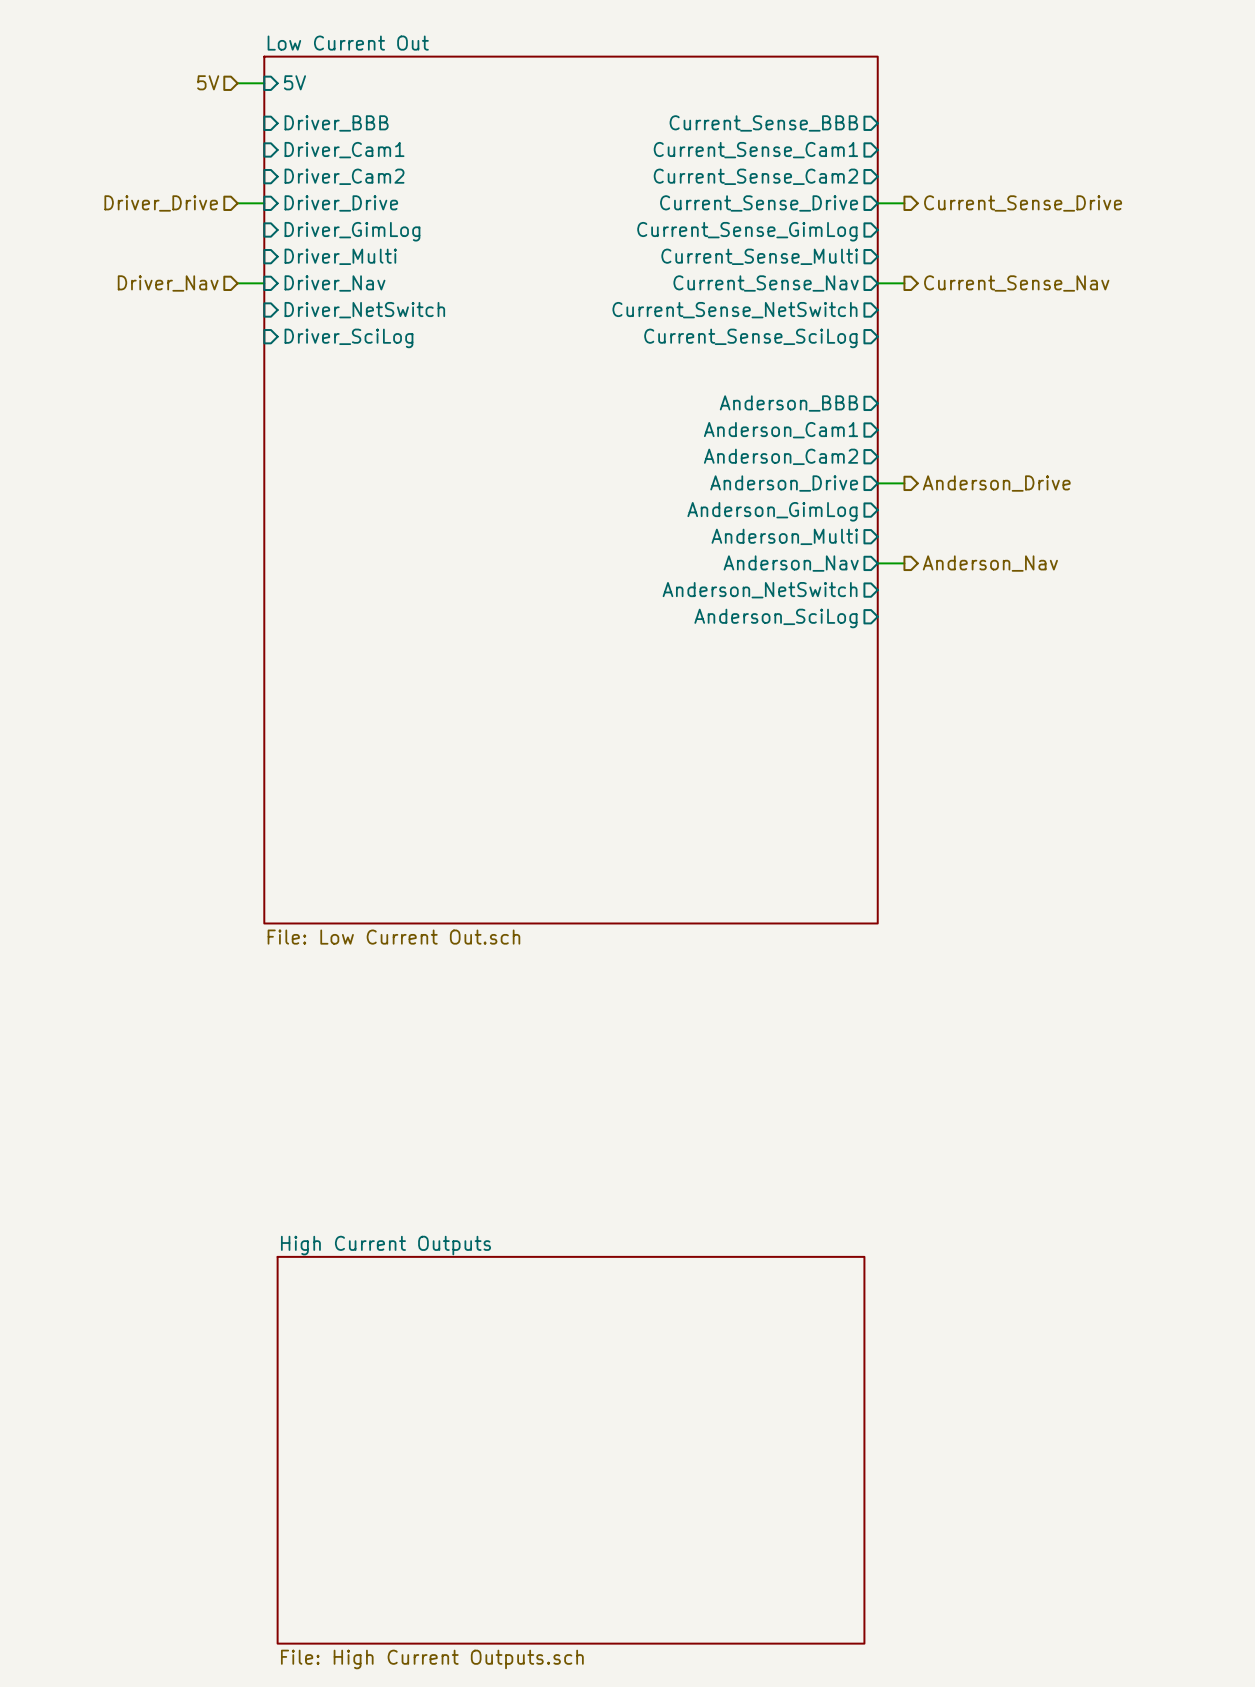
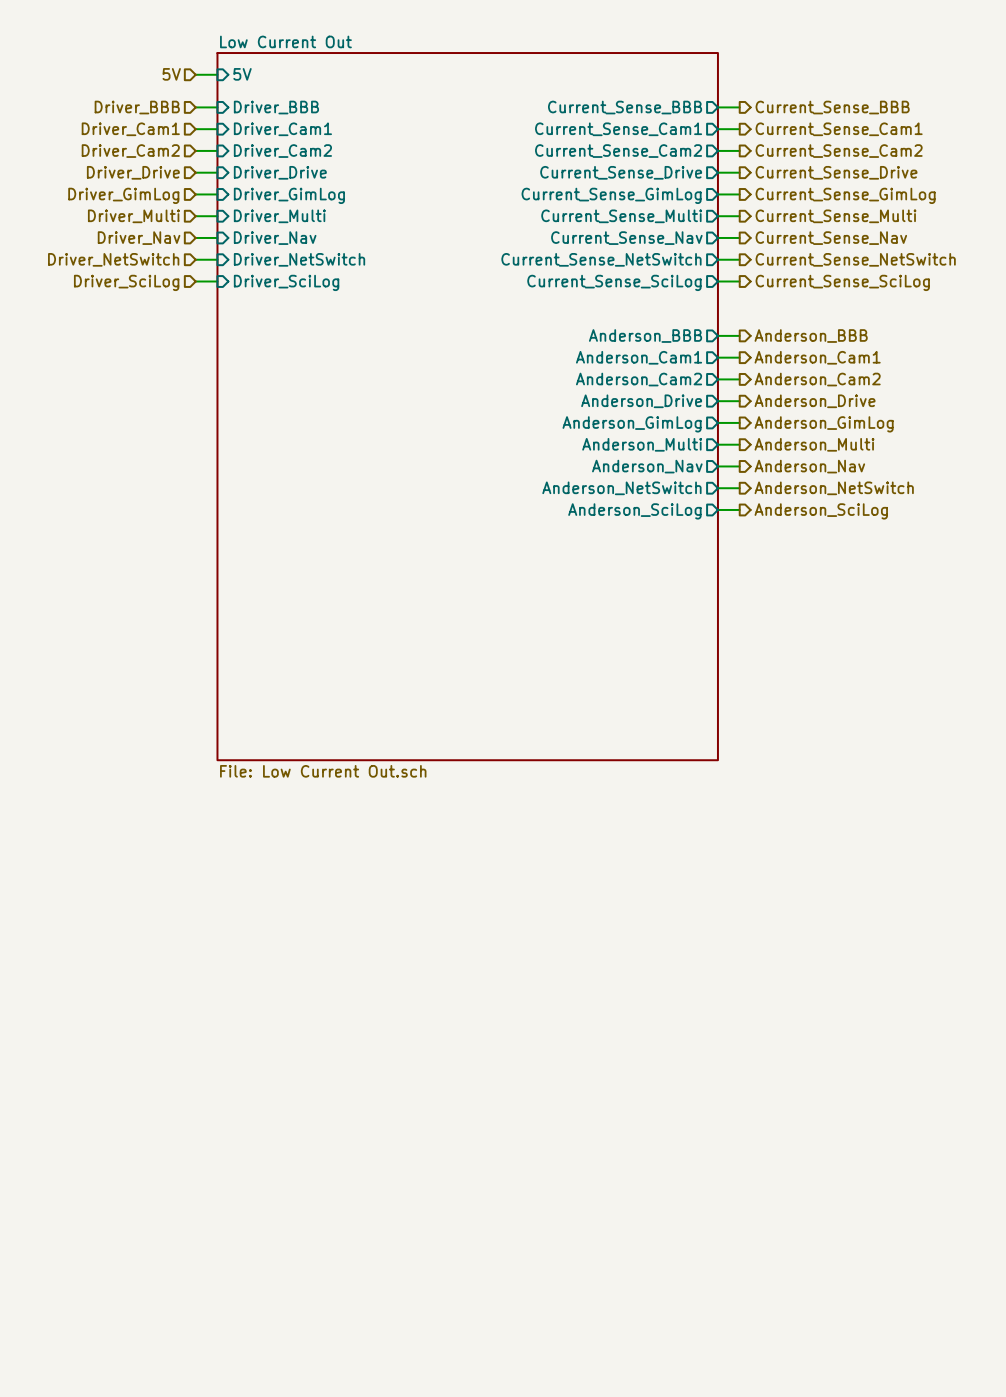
hierarchical label: none -> Driver_BBB (137, 107)
wire: none -> (195, 107) (217, 107)
wire: none -> (717, 107) (739, 107)
hierarchical label: none -> Current_Sense_BBB (832, 107)
wire: none -> (195, 129) (217, 129)
wire: none -> (717, 129) (739, 129)
hierarchical label: none -> Driver_Cam1 (130, 129)
hierarchical label: none -> Current_Sense_Cam1 (839, 129)
hierarchical label: none -> Driver_Cam2 (130, 151)
wire: none -> (195, 150) (217, 150)
wire: none -> (717, 150) (739, 150)
hierarchical label: none -> Current_Sense_Cam2 (839, 151)
wire: none -> (195, 194) (217, 194)
wire: none -> (717, 194) (739, 194)
hierarchical label: none -> Driver_GimLog (123, 195)
hierarchical label: none -> Current_Sense_GimLog (845, 195)
hierarchical label: none -> Driver_Multi (133, 216)
wire: none -> (195, 216) (217, 216)
wire: none -> (717, 216) (739, 216)
hierarchical label: none -> Current_Sense_Multi (836, 216)
hierarchical label: none -> Driver_NetSwitch (113, 259)
wire: none -> (195, 259) (217, 259)
wire: none -> (717, 259) (739, 259)
hierarchical label: none -> Current_Sense_NetSwitch (855, 259)
wire: none -> (195, 281) (217, 281)
wire: none -> (717, 281) (739, 281)
hierarchical label: none -> Driver_SciLog (126, 282)
hierarchical label: none -> Current_Sense_SciLog (842, 282)
wire: none -> (717, 335) (739, 335)
hierarchical label: none -> Anderson_BBB (811, 336)
wire: none -> (717, 357) (739, 357)
hierarchical label: none -> Anderson_Cam1 (817, 357)
wire: none -> (717, 379) (739, 379)
hierarchical label: none -> Anderson_Cam2 (817, 379)
wire: none -> (717, 422) (739, 422)
hierarchical label: none -> Anderson_GimLog (824, 424)
wire: none -> (717, 444) (739, 444)
hierarchical label: none -> Anderson_Multi (814, 444)
wire: none -> (717, 488) (739, 488)
hierarchical label: none -> Anderson_NetSwitch (834, 488)
wire: none -> (717, 509) (739, 509)
hierarchical label: none -> Anderson_SciLog (821, 511)
sheet High Current Outputs: File: High Current Outputs.sch (571, 1450) -> none

